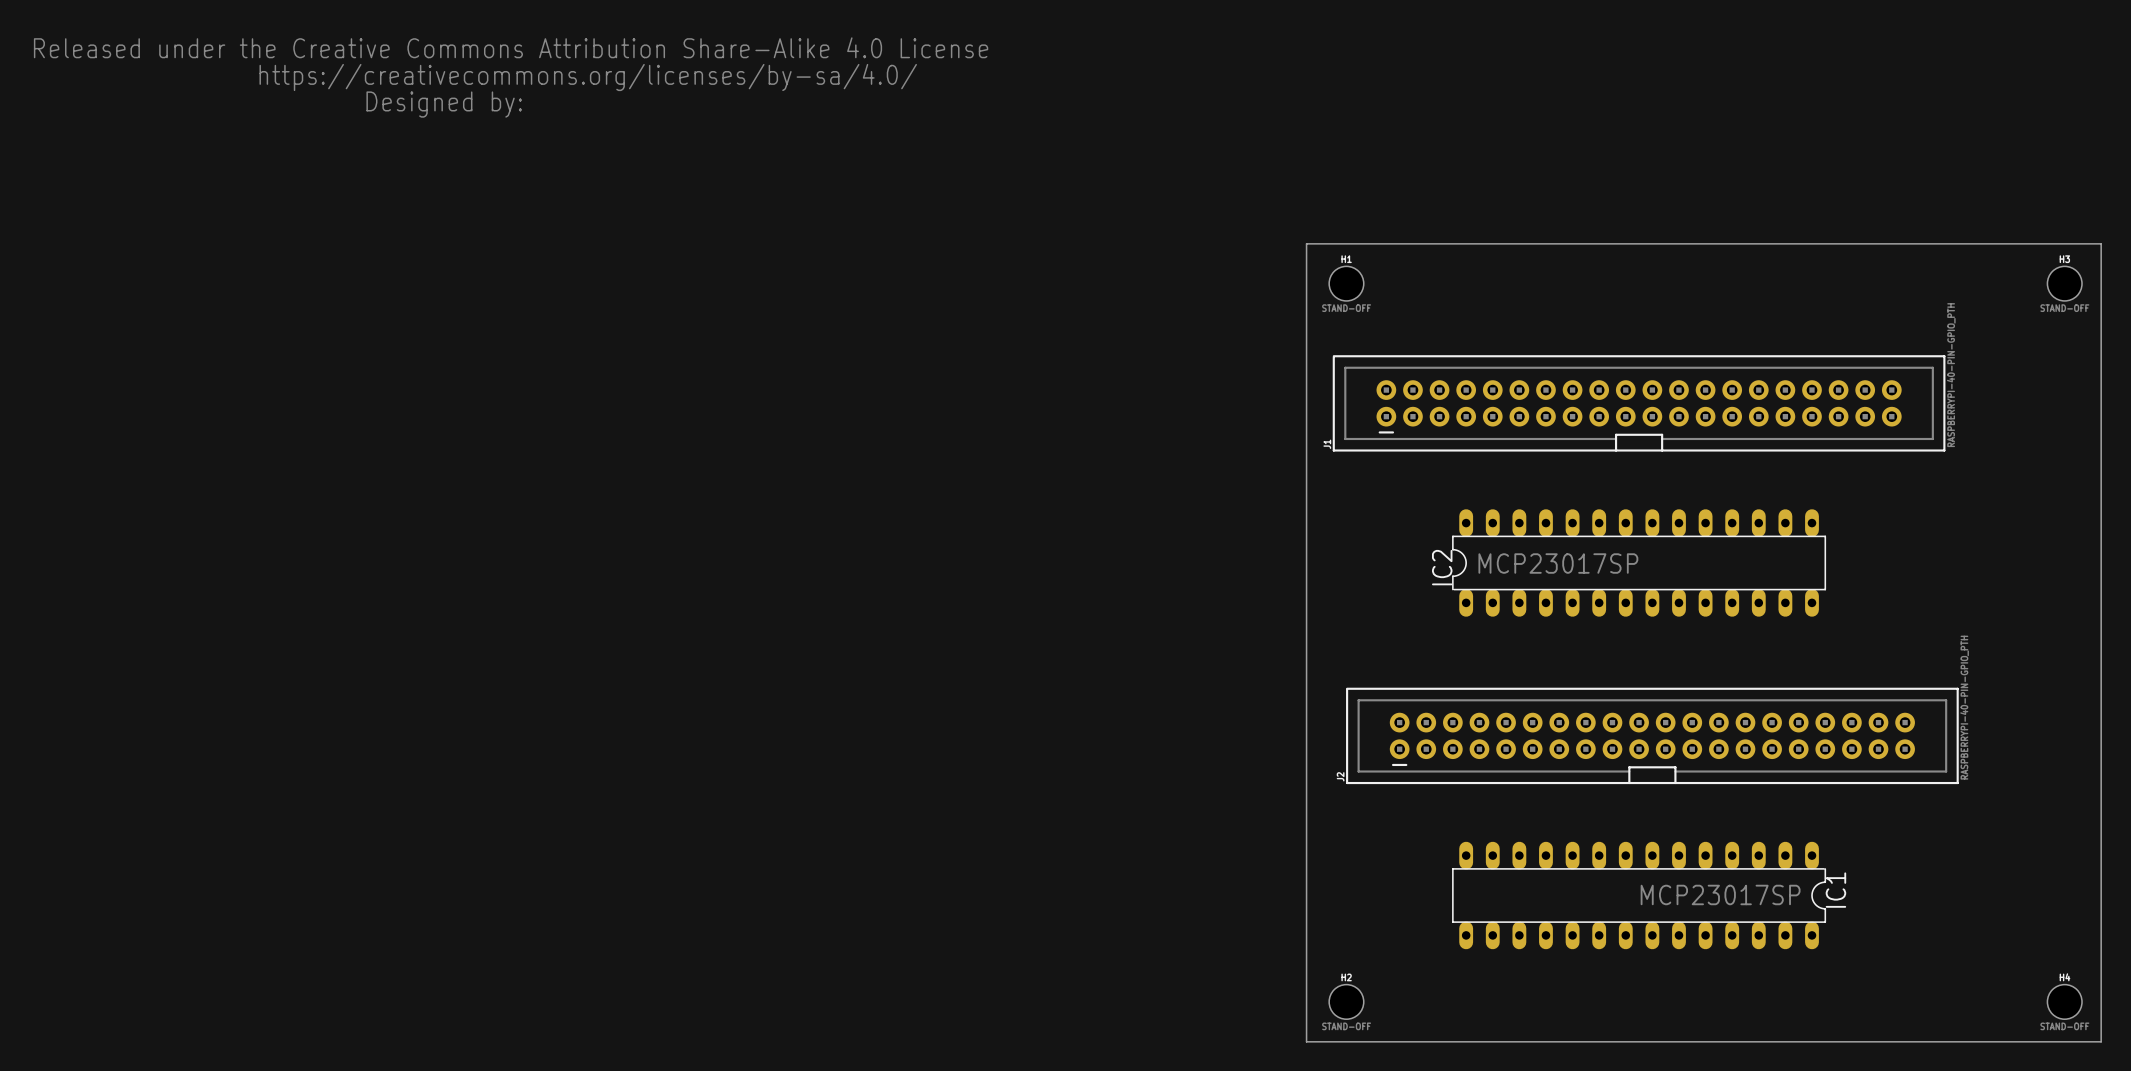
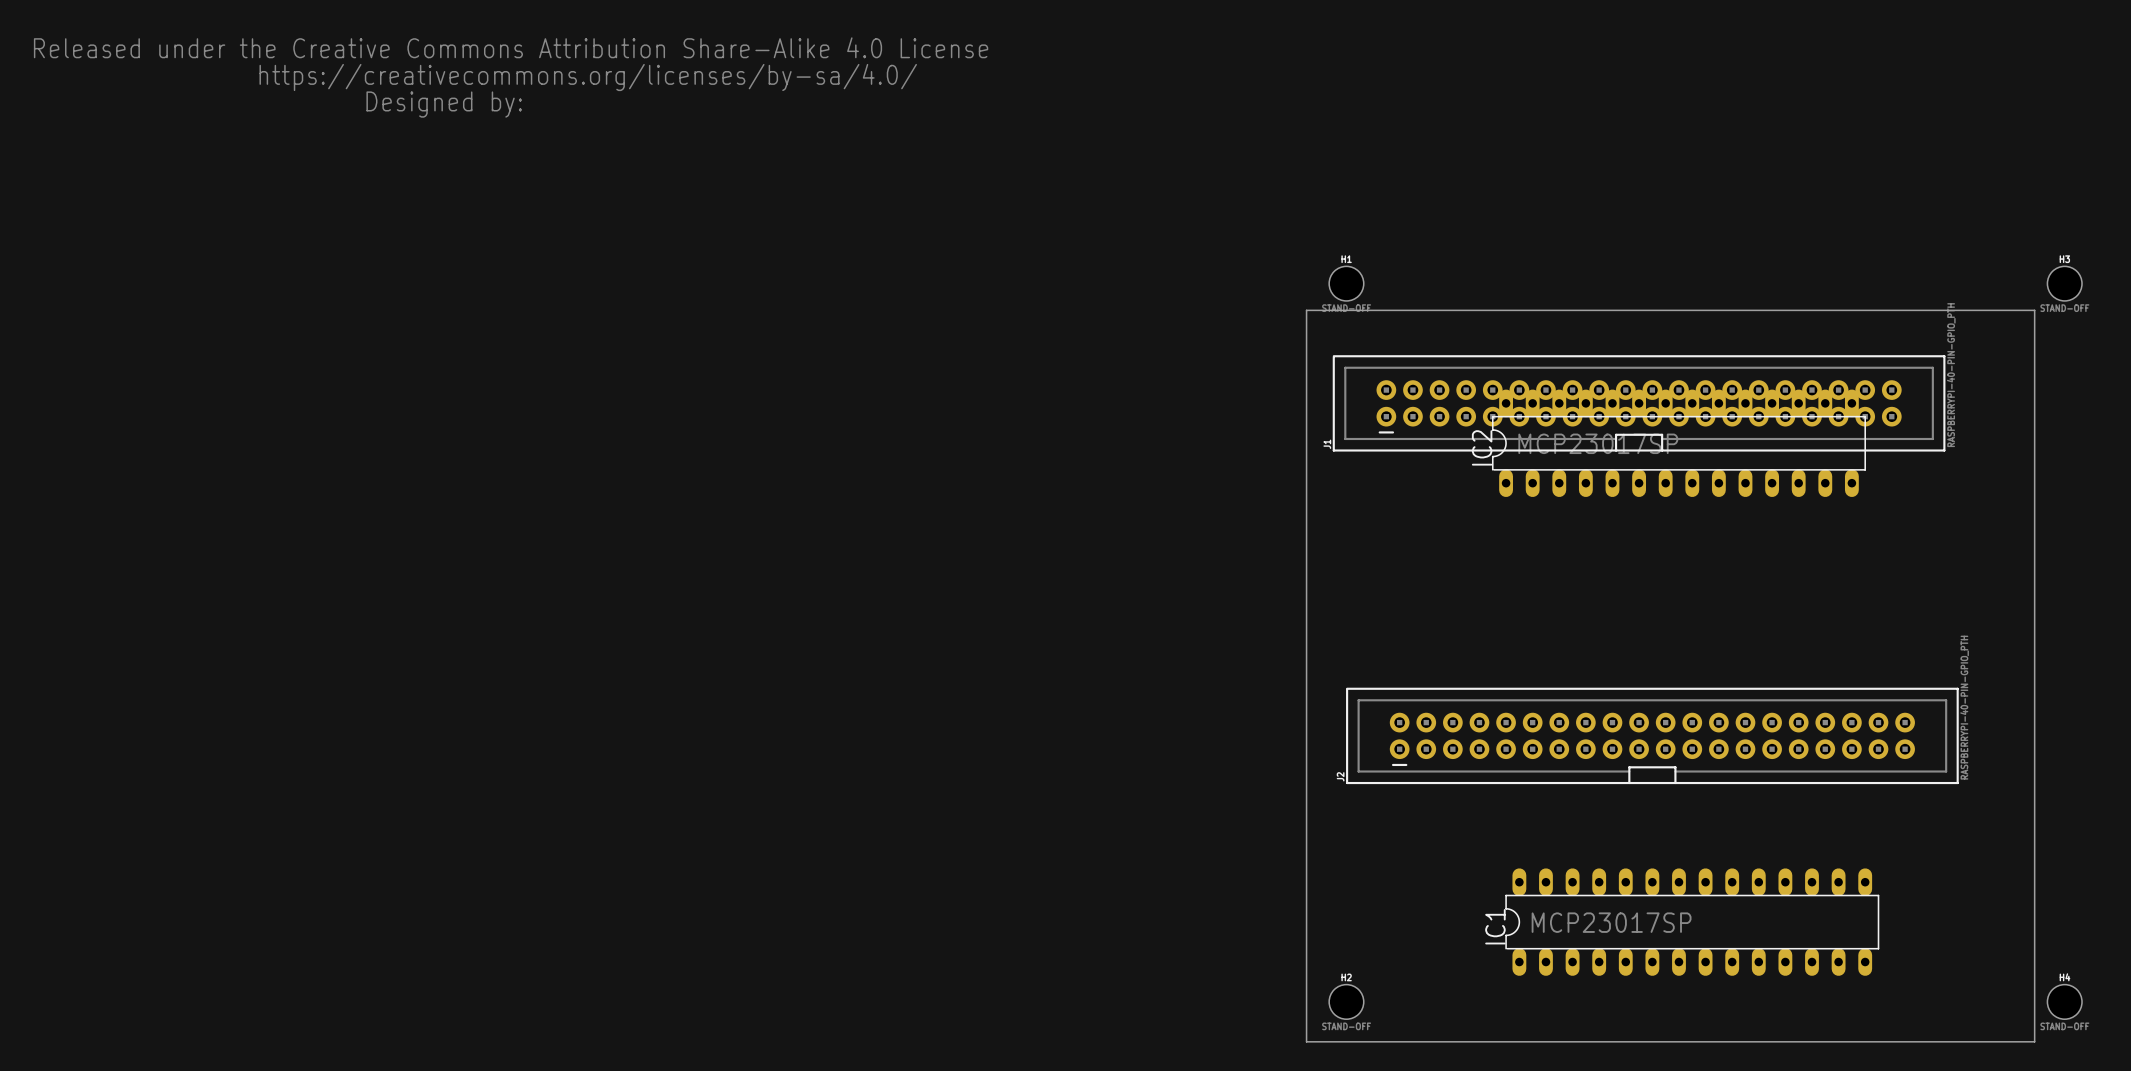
board edge: (1306, 310) (1306, 243) (2101, 243) (2101, 1041) (2034, 1041) -> (1306, 310) (2034, 310) (2034, 1041)
IC2 position: (1639, 562) -> (1678, 443)
IC1 rotation: 0° (1639, 895) -> 180° (1692, 922)

